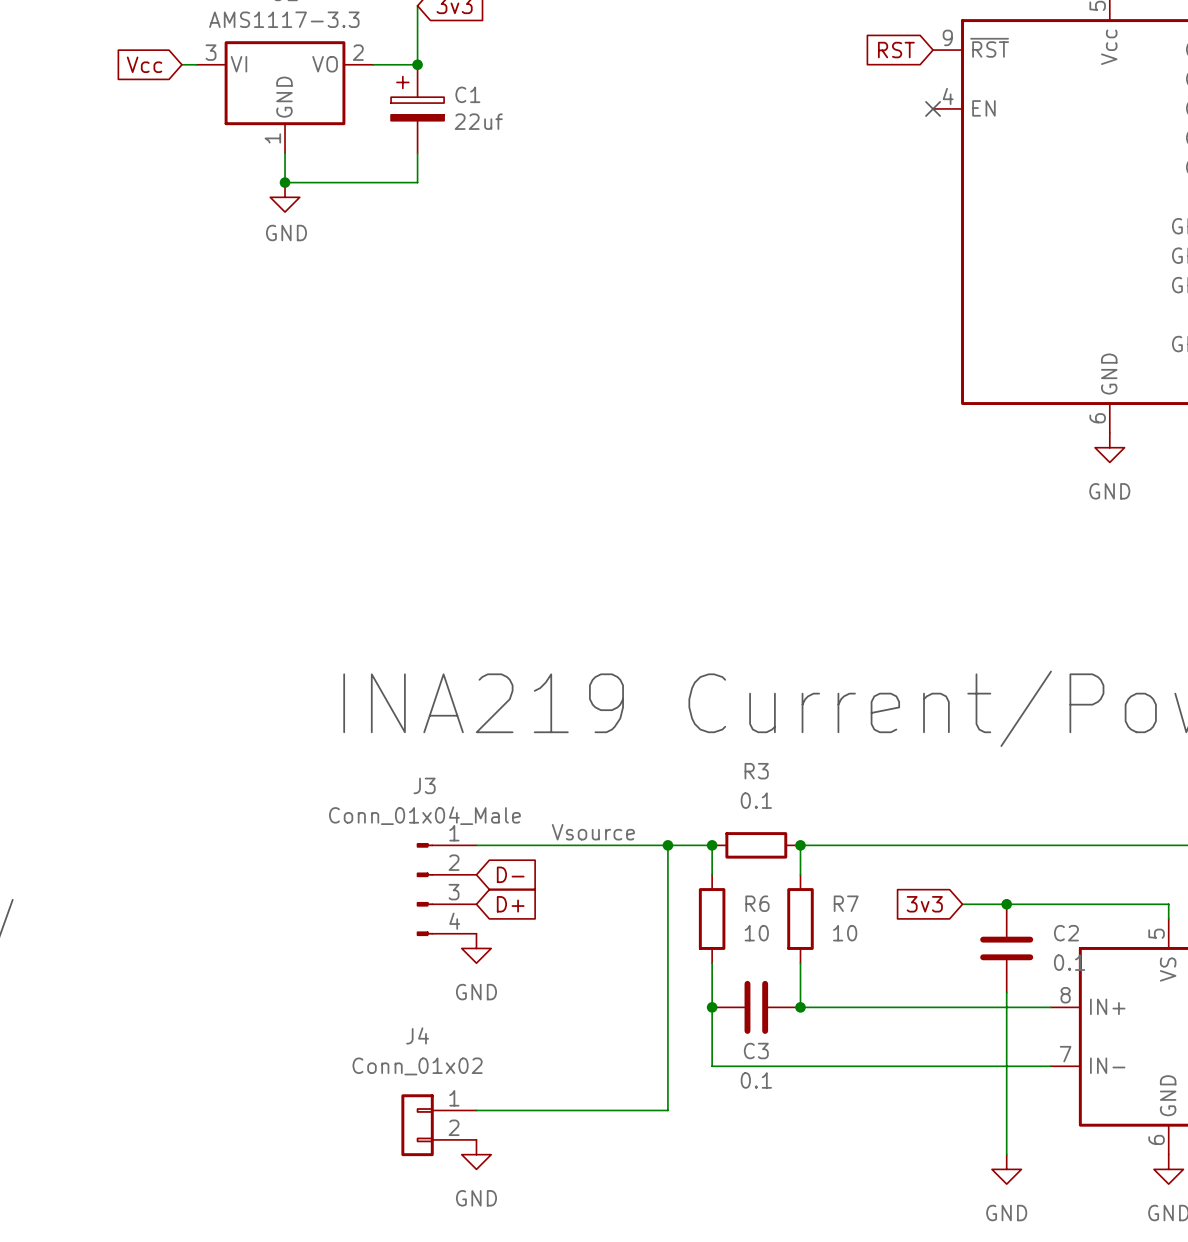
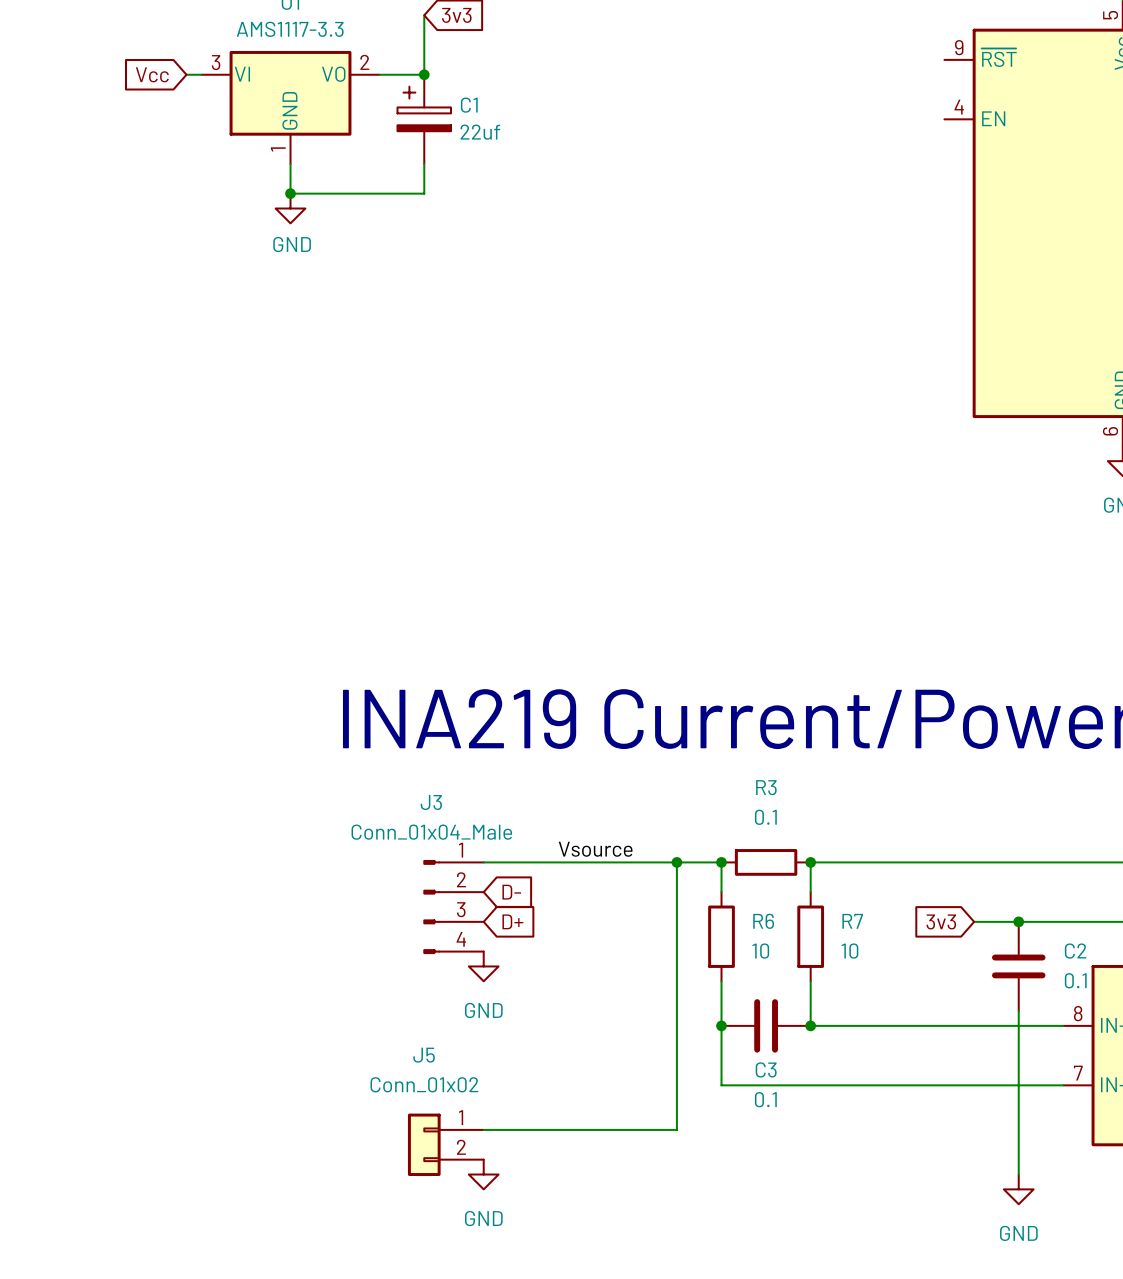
global label: RST (896, 50) -> none
no-connect mark: (933, 108) -> none
J4 name: J4 (417, 1035) -> J5 (424, 1055)

